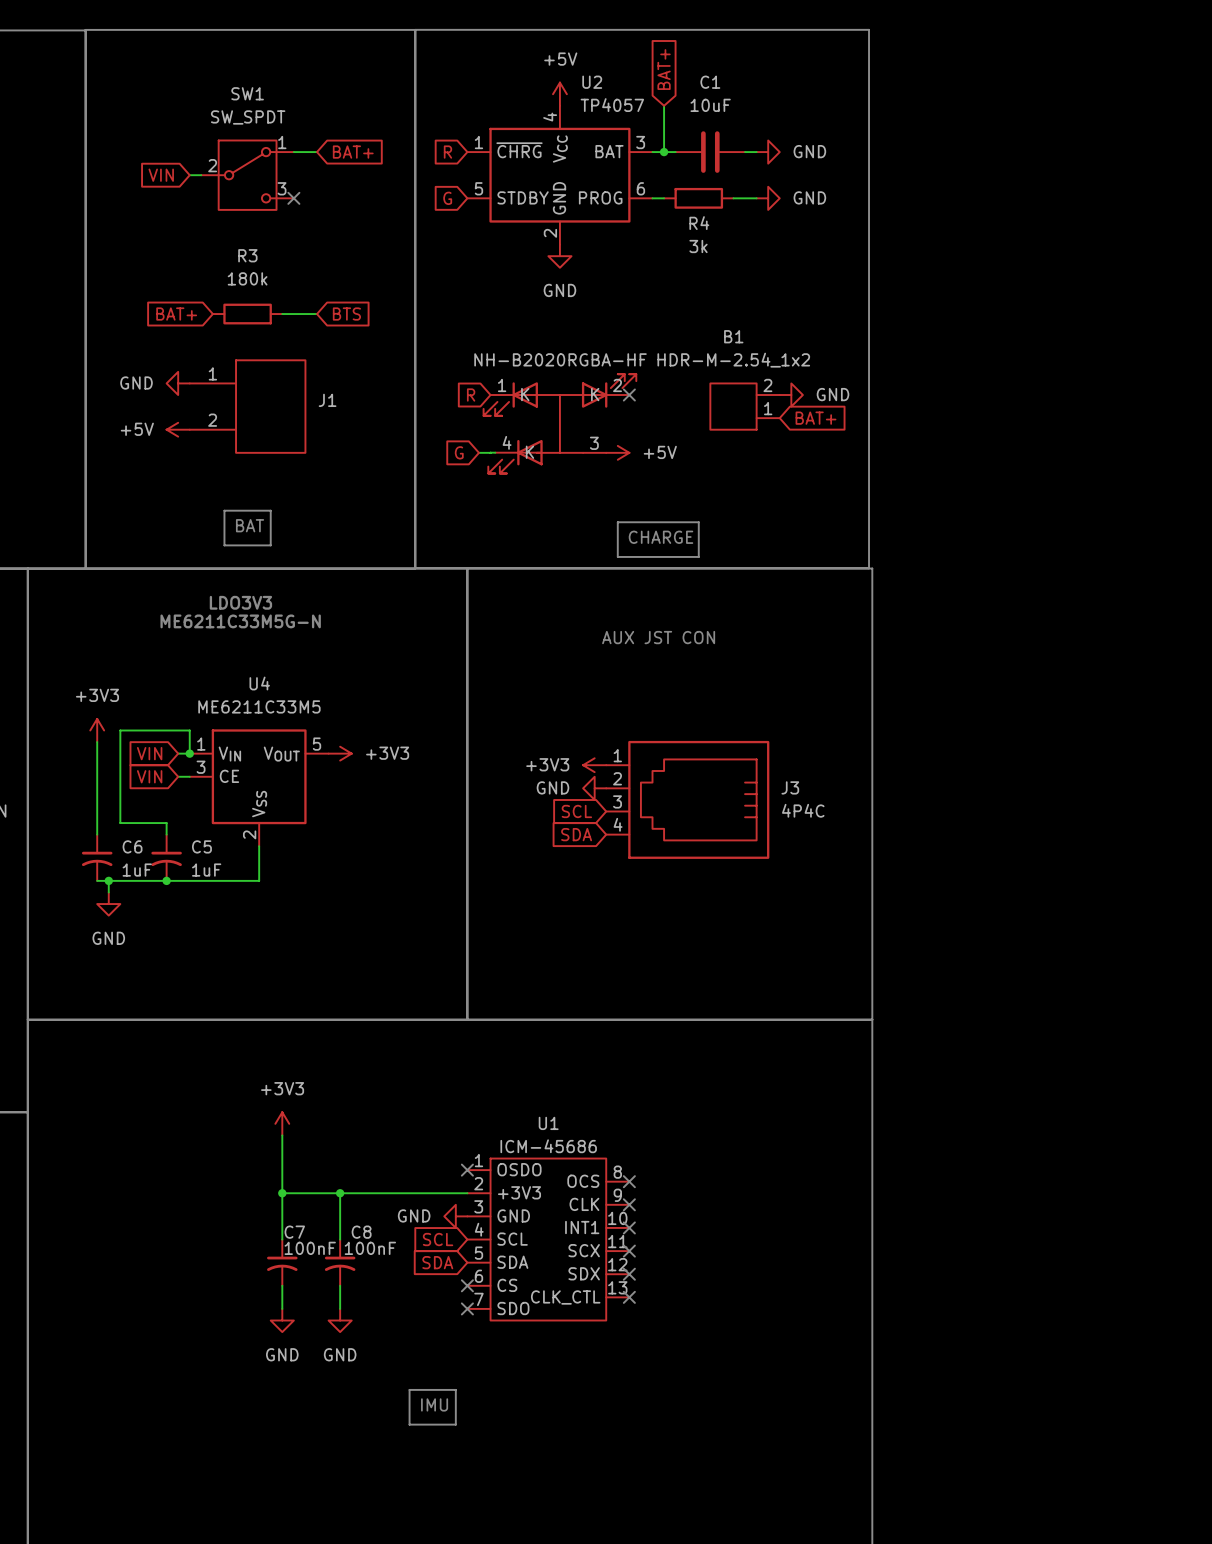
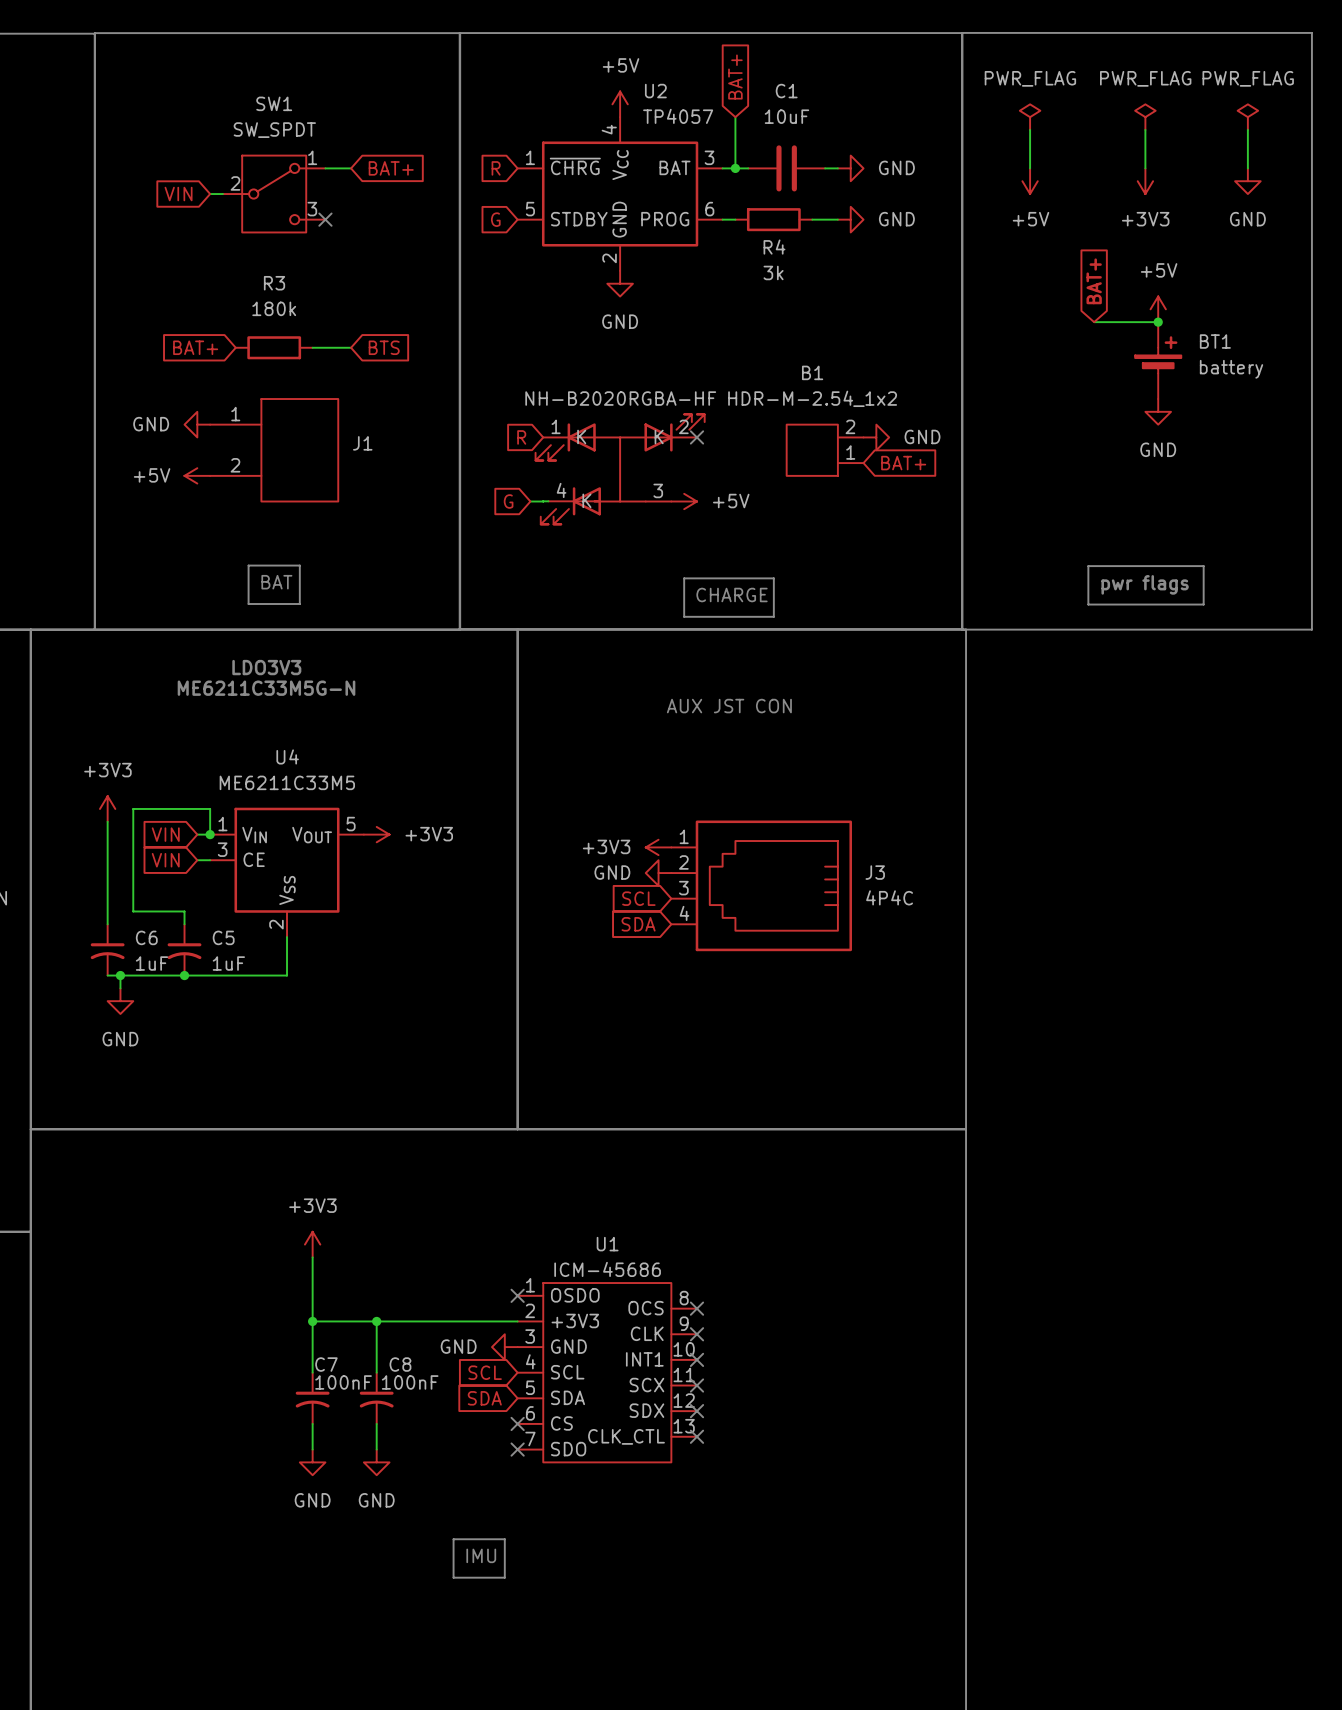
power symbol: none -> PWR_FLAG (1030, 117)
power symbol: none -> PWR_FLAG (1145, 117)
power symbol: none -> PWR_FLAG (1247, 117)
wire: none -> (1030, 129) (1030, 168)
wire: none -> (1145, 129) (1145, 168)
wire: none -> (1247, 129) (1247, 168)
power symbol: none -> +5V (1030, 181)
power symbol: none -> +3V3 (1145, 181)
power symbol: none -> GND (1247, 181)
global label: none -> BAT+ (1094, 281)
power symbol: none -> +5V (1158, 309)
wire: none -> (1094, 322) (1158, 322)
junction: none -> (1158, 322)
BT1: none -> battery (1158, 360)
power symbol: none -> GND (1158, 411)
line: none -> (1088, 566) (1203, 566) (1203, 604) (1088, 604) (1088, 566)
text: none -> pwr flags (1145, 584)
line: none -> (962, 629) (962, 32) (1311, 32) (1311, 629) (966, 629)

